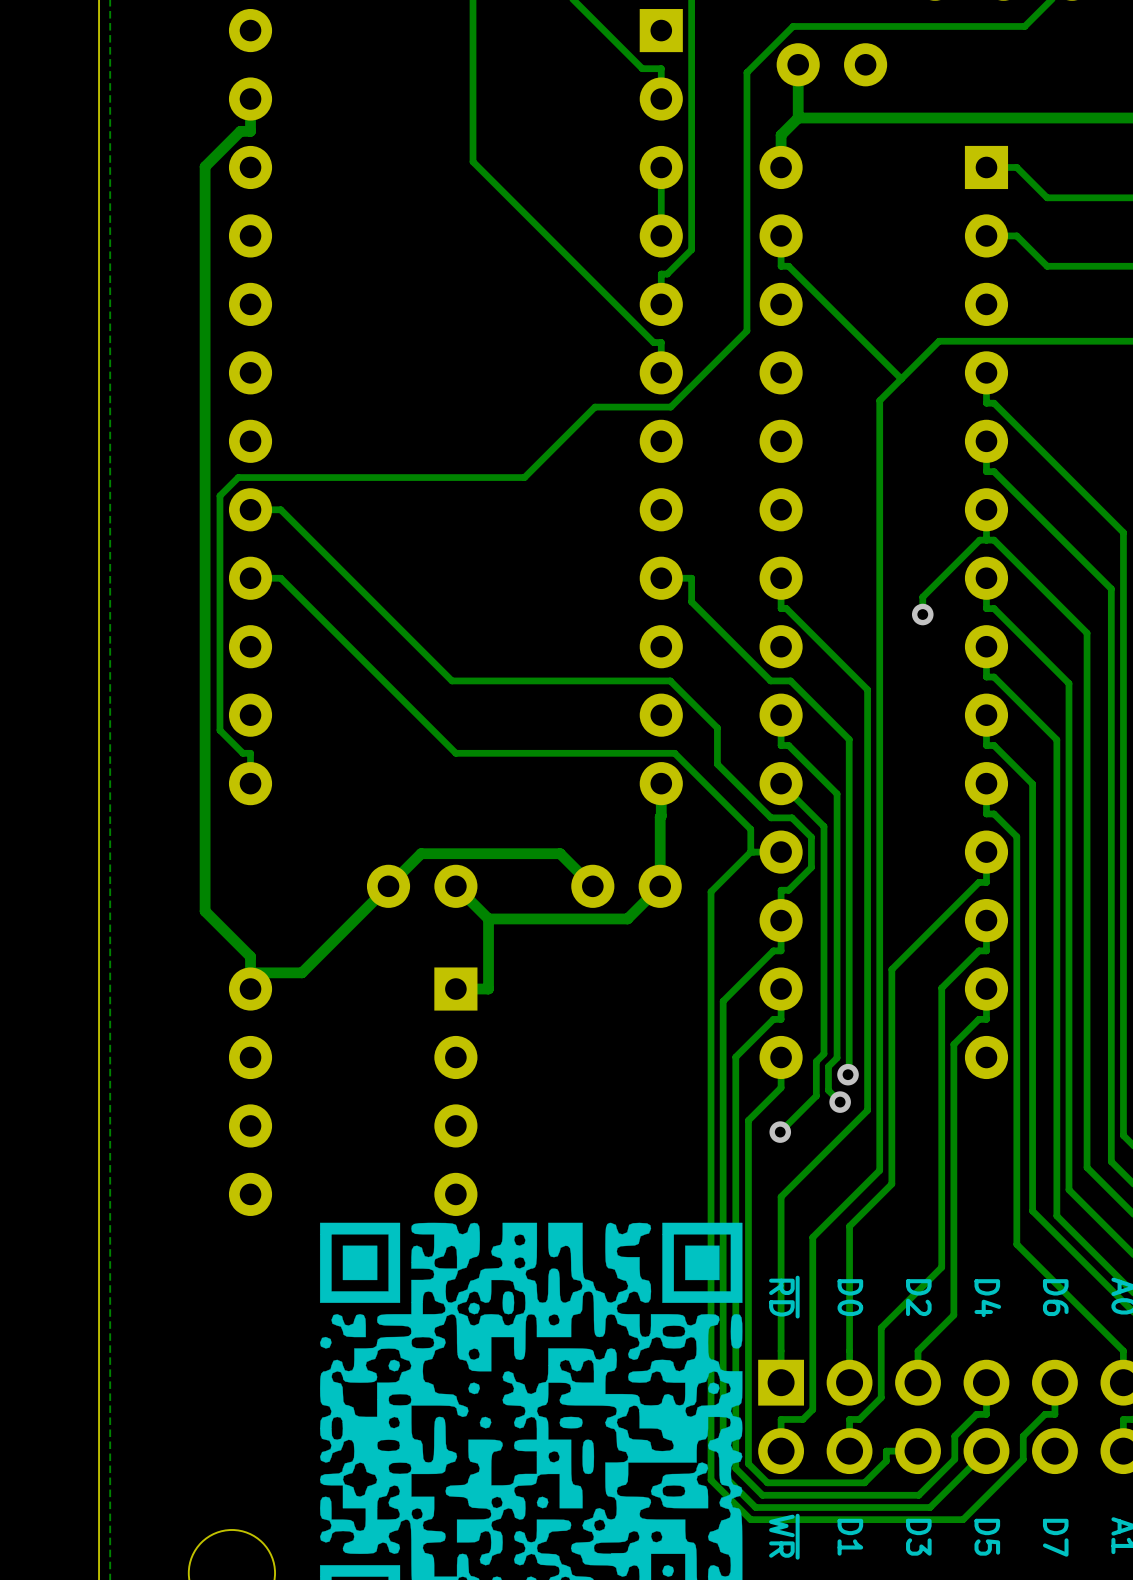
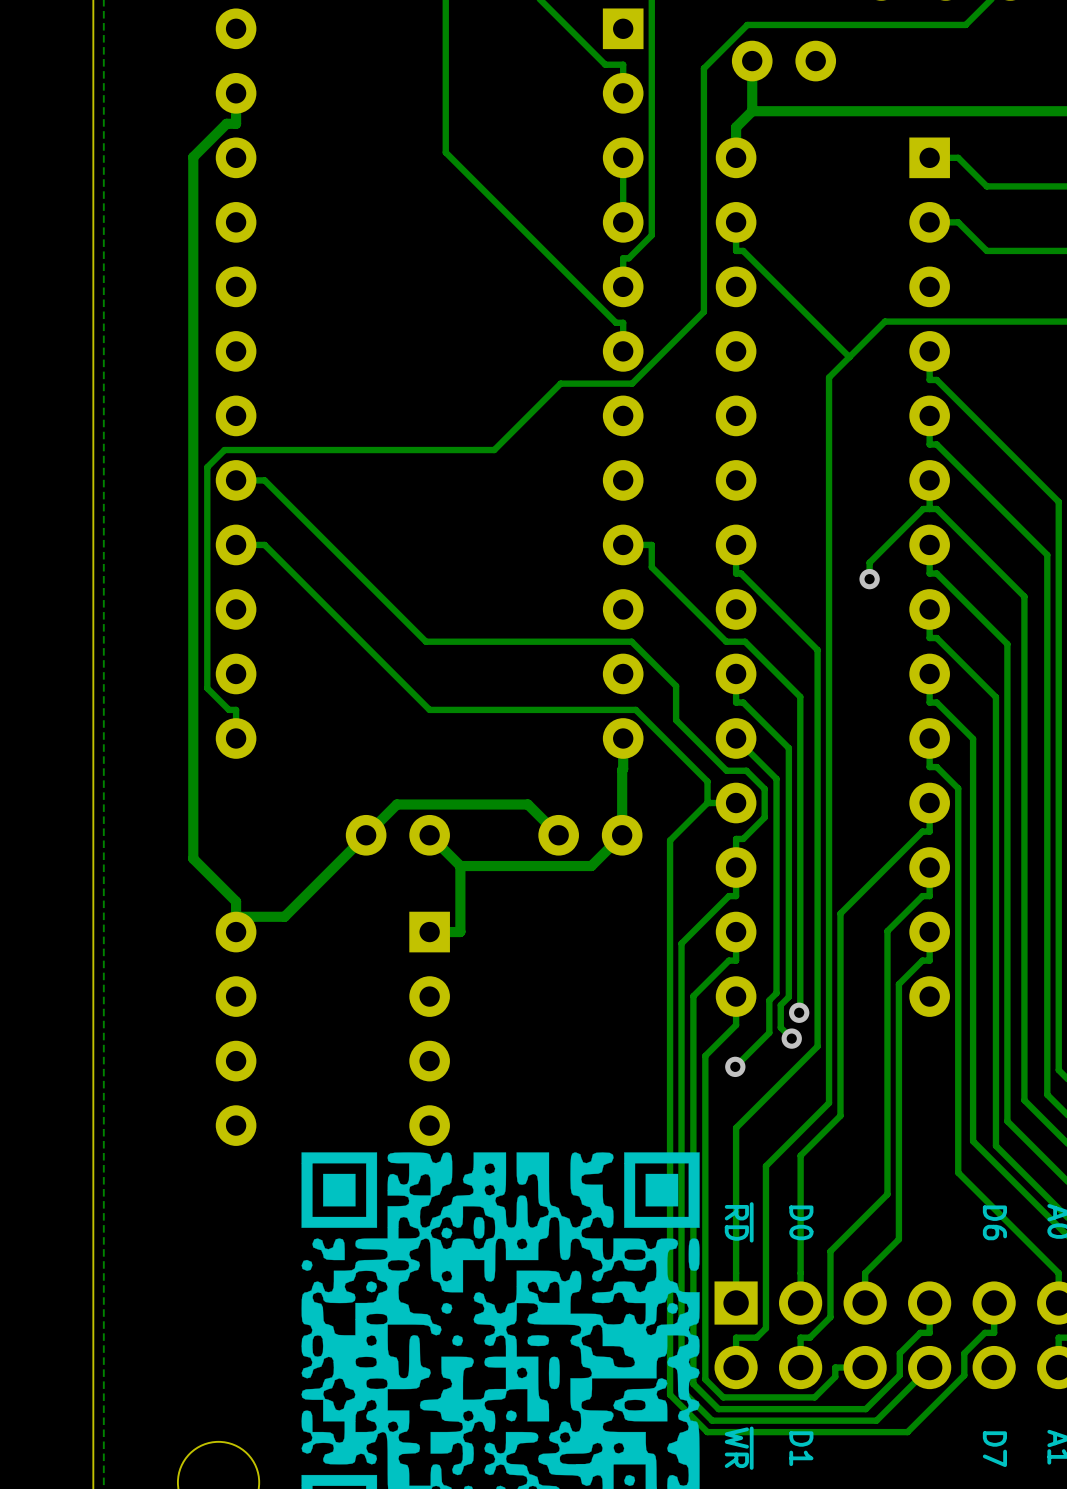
text: D2 (918, 1297) -> none
text: D4 (987, 1298) -> none
text: D3 (918, 1537) -> none
text: D5 (987, 1537) -> none

